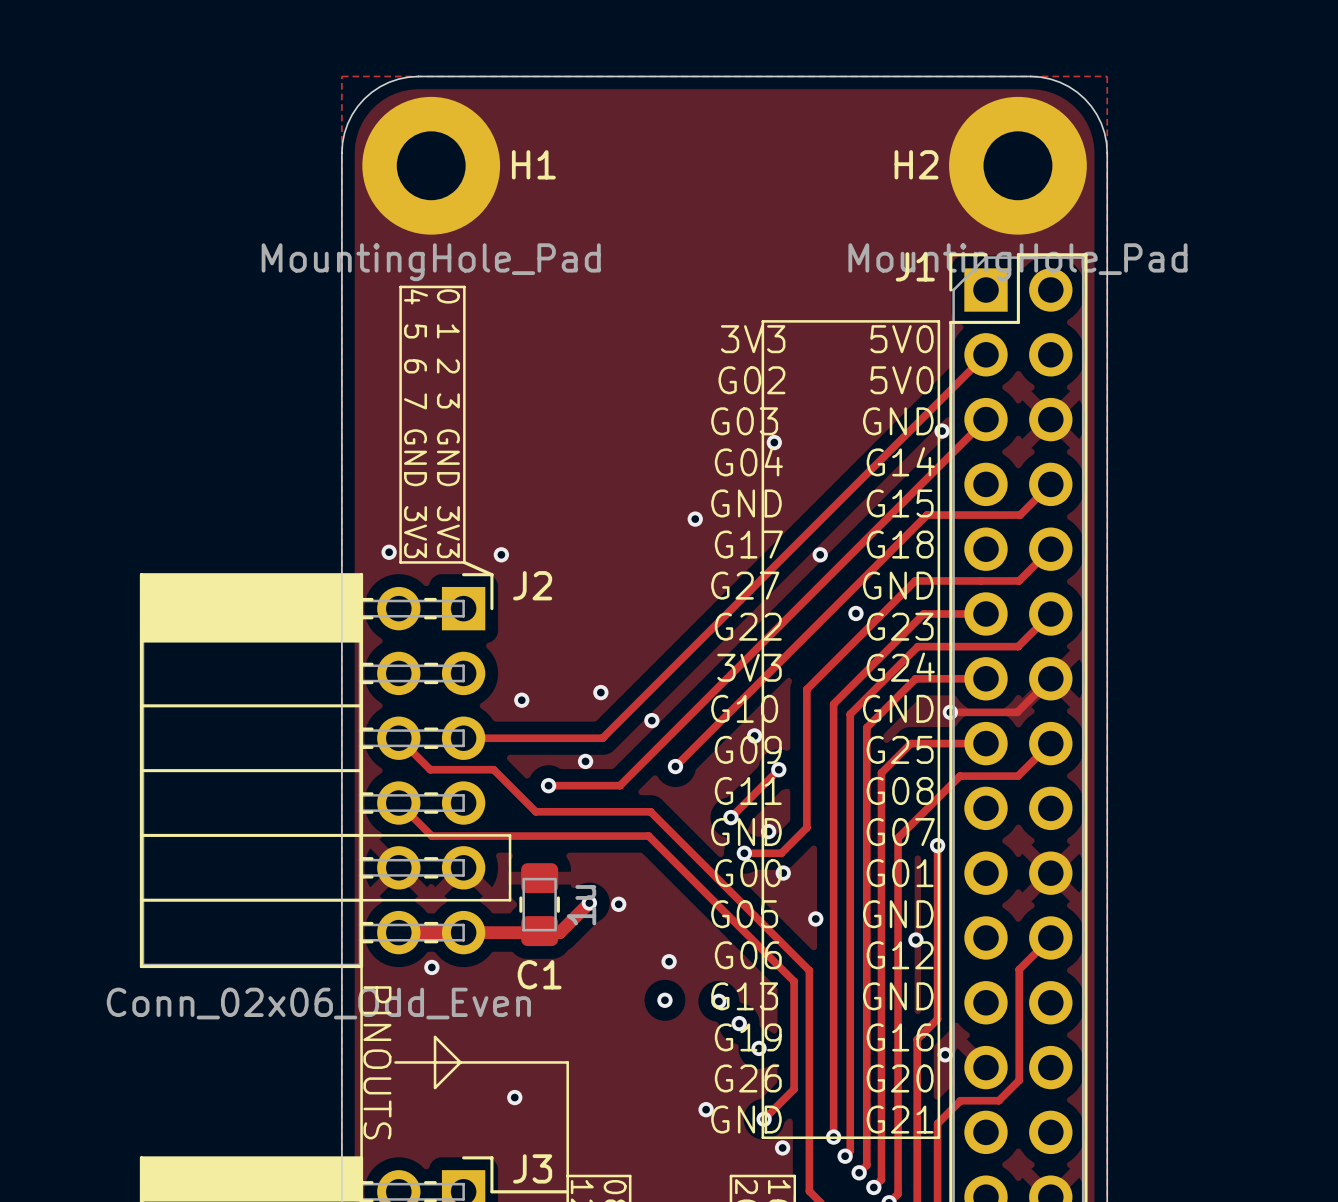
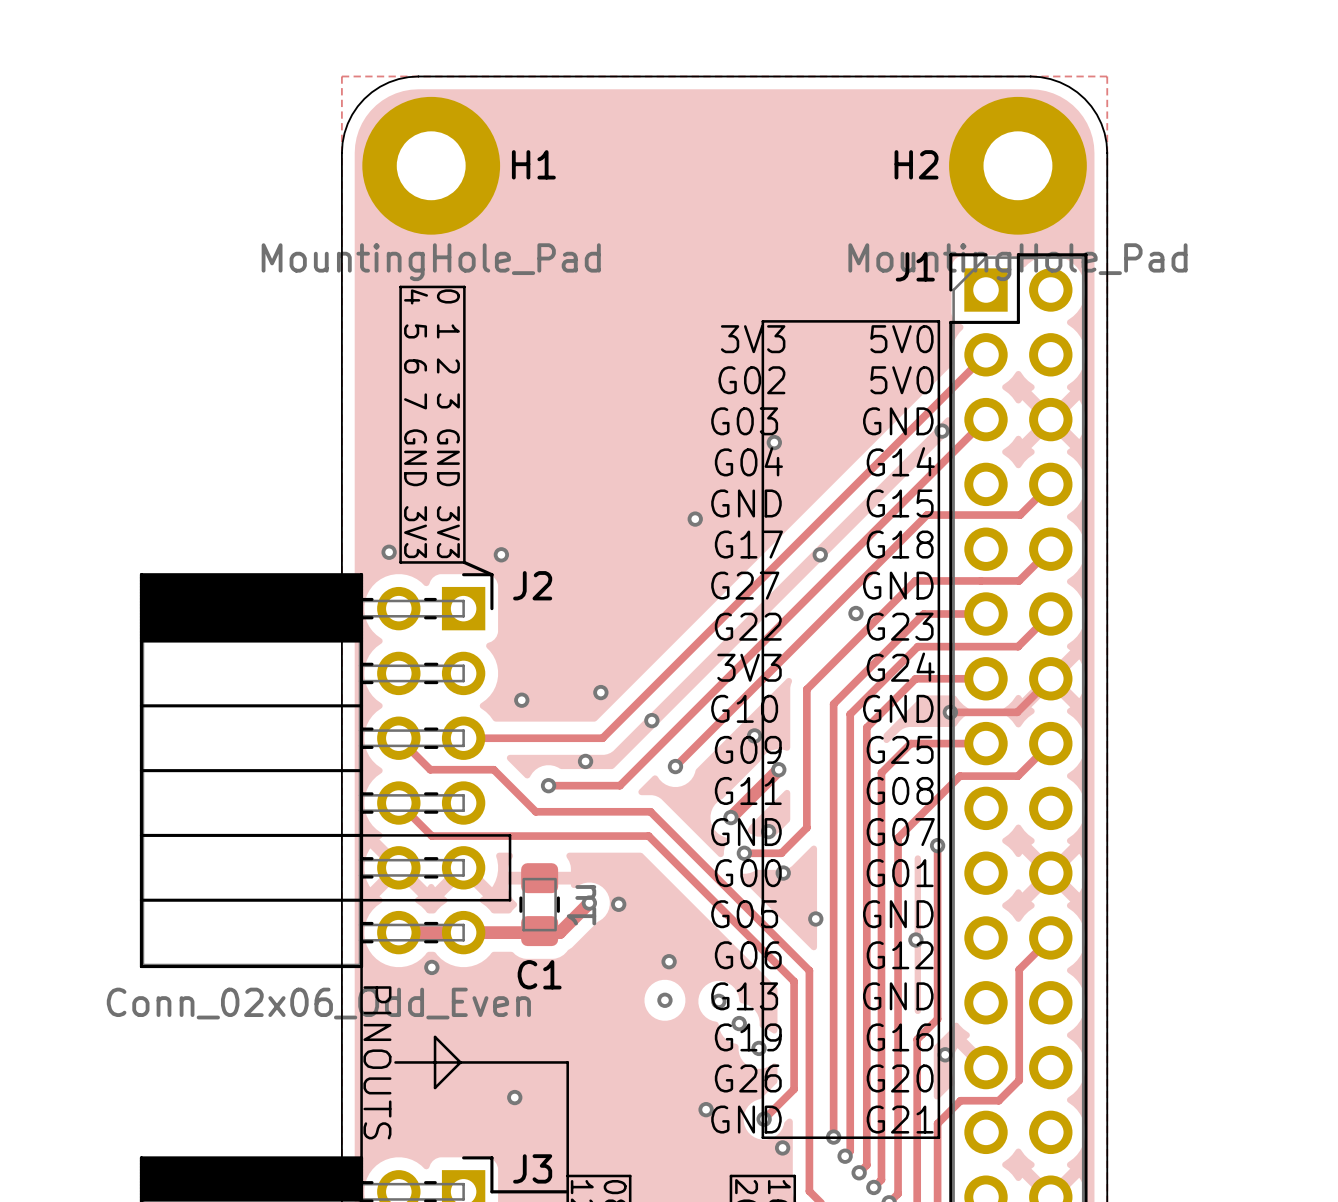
track width: thin (778, 769) (730, 817) -> thick (778, 769) (730, 817)

